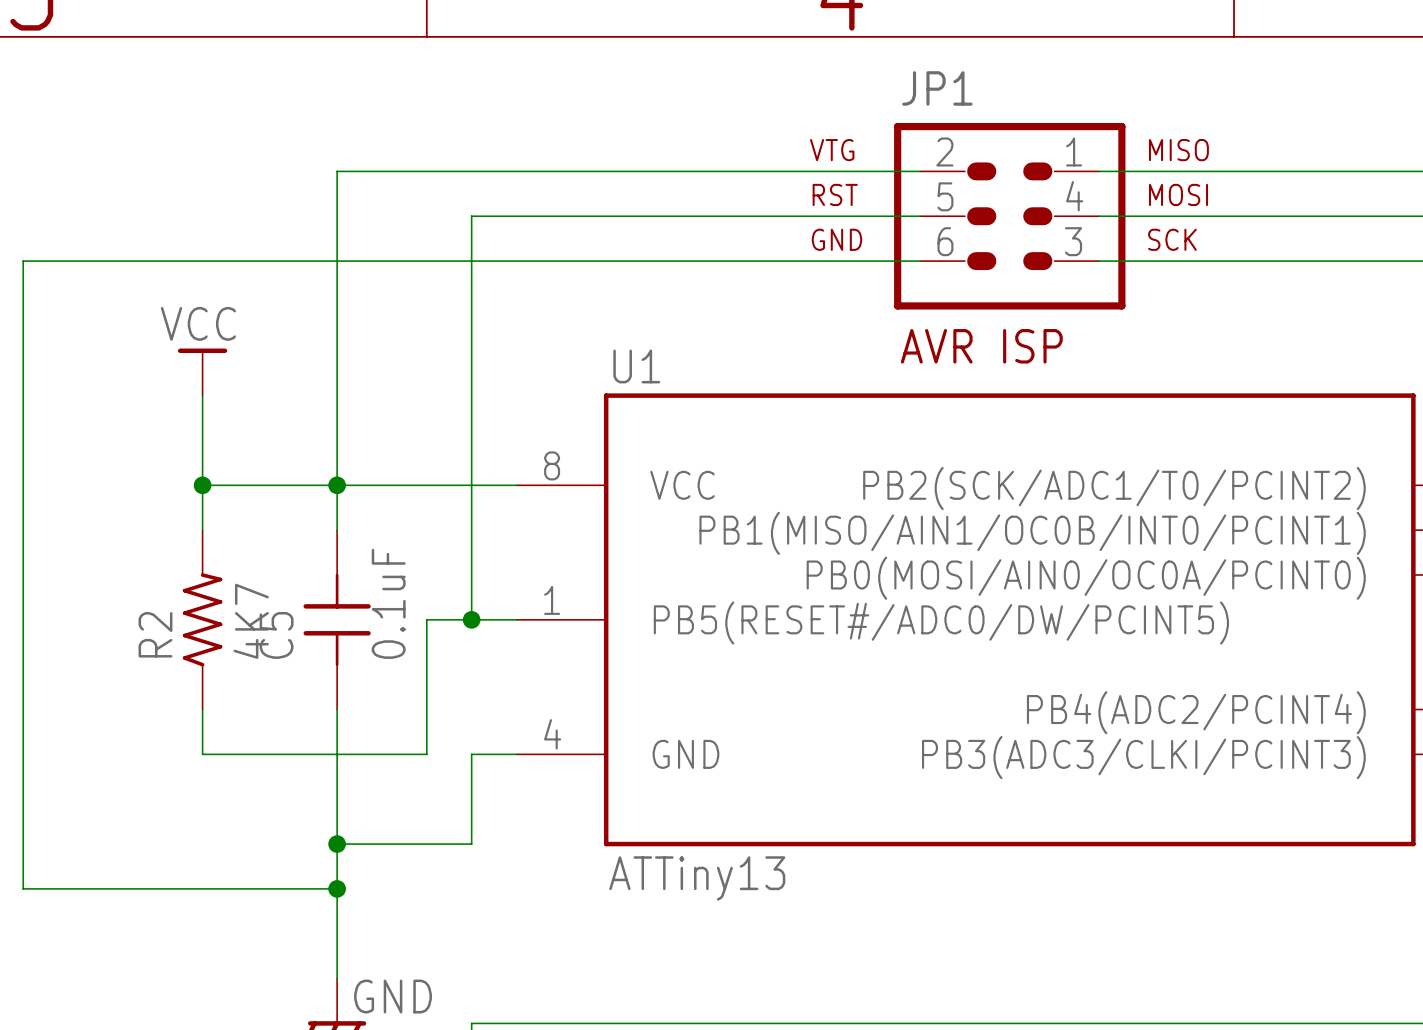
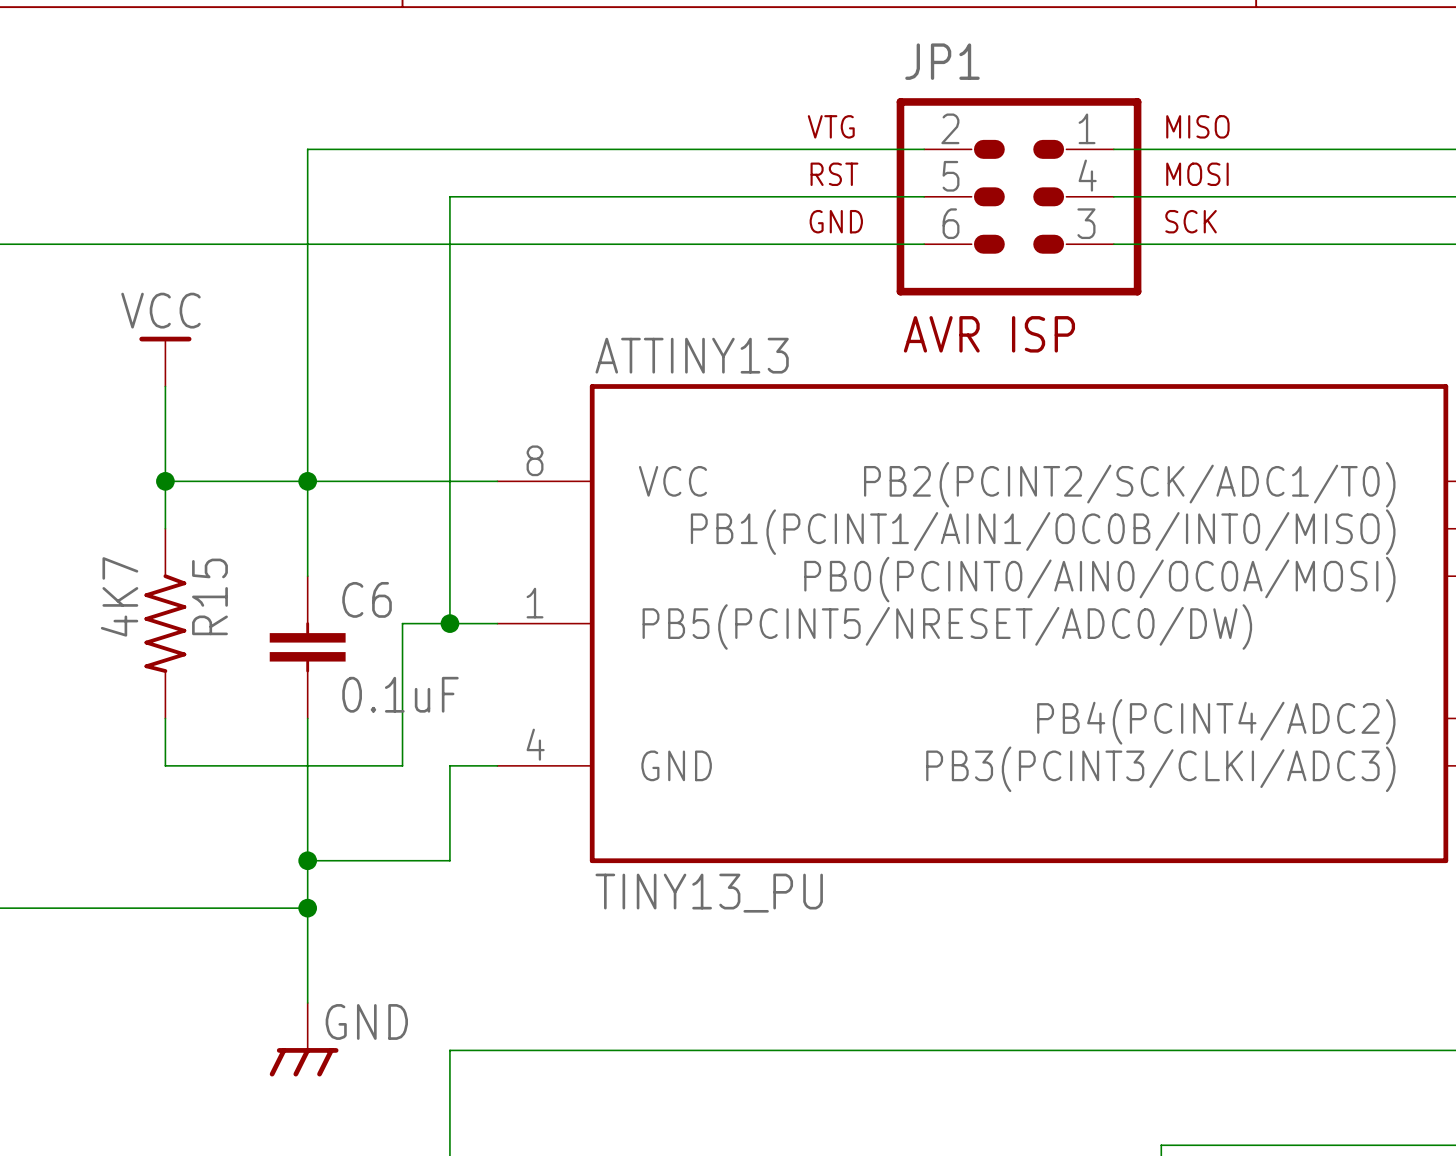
U1 name: U1 (636, 366) -> ATTINY13 (692, 355)
U1 pin name: PB2(SCK/ADC1/T0/PCINT2) (1114, 488) -> PB2(PCINT2/SCK/ADC1/T0) (1129, 484)
U1 pin name: PB1(MISO/AIN1/OC0B/INT0/PCINT1) (1032, 533) -> PB1(PCINT1/AIN1/OC0B/INT0/MISO) (1043, 532)
U1 pin name: PB0(MOSI/AIN0/OC0A/PCINT0) (1086, 578) -> PB0(PCINT0/AIN0/OC0A/MOSI) (1099, 579)
R2: 4K7 (202, 619) -> none
R15: none -> 4K7 (165, 623)
C5: 0.1uF (337, 619) -> none
U1 pin name: PB5(RESET#/ADC0/DW/PCINT5) (941, 623) -> PB5(PCINT5/NRESET/ADC0/DW) (947, 627)
C6: none -> 0.1uF (307, 647)
U1 pin name: PB4(ADC2/PCINT4) (1196, 712) -> PB4(PCINT4/ADC2) (1216, 721)
U1 pin name: PB3(ADC3/CLKI/PCINT3) (1143, 757) -> PB3(PCINT3/CLKI/ADC3) (1160, 769)
U1 value: ATTiny13 (697, 878) -> TINY13_PU (709, 893)

